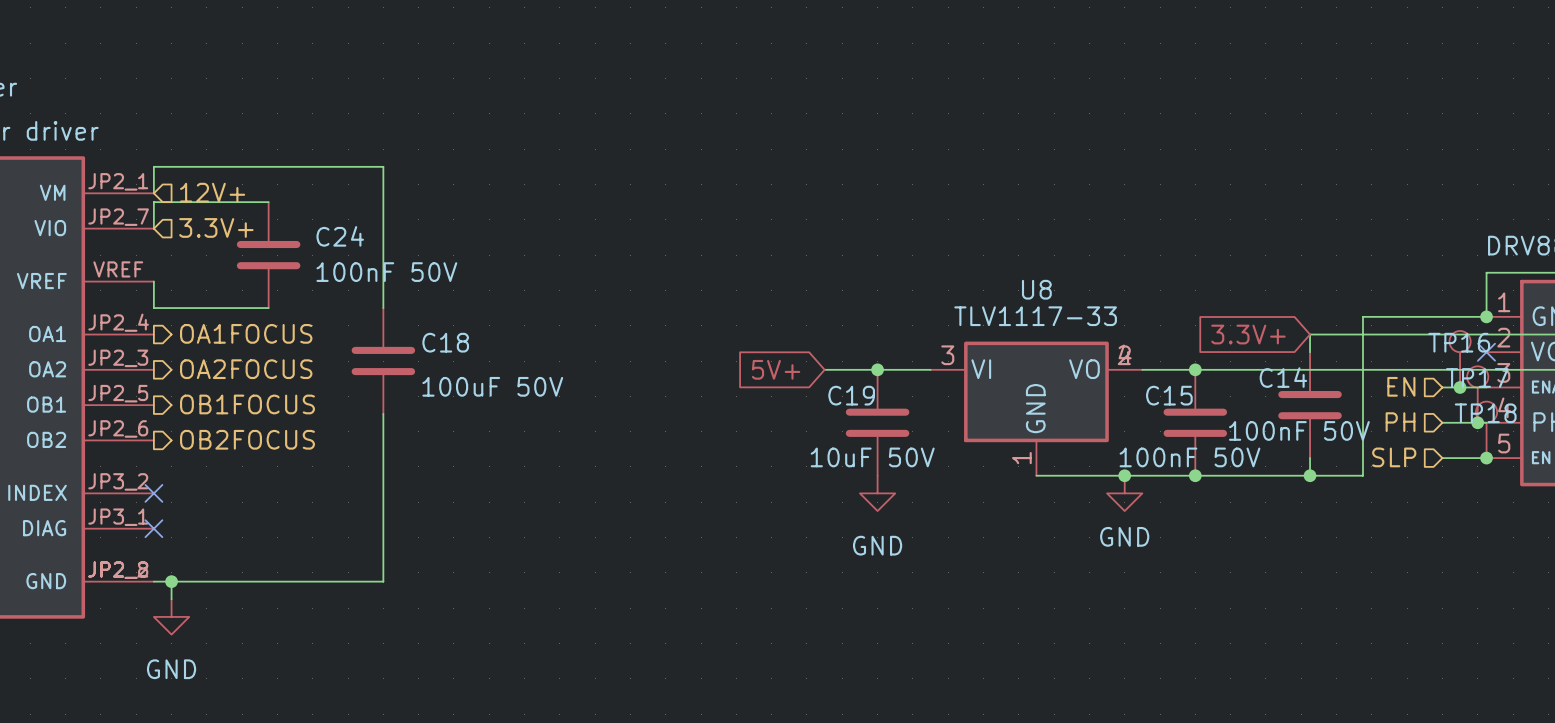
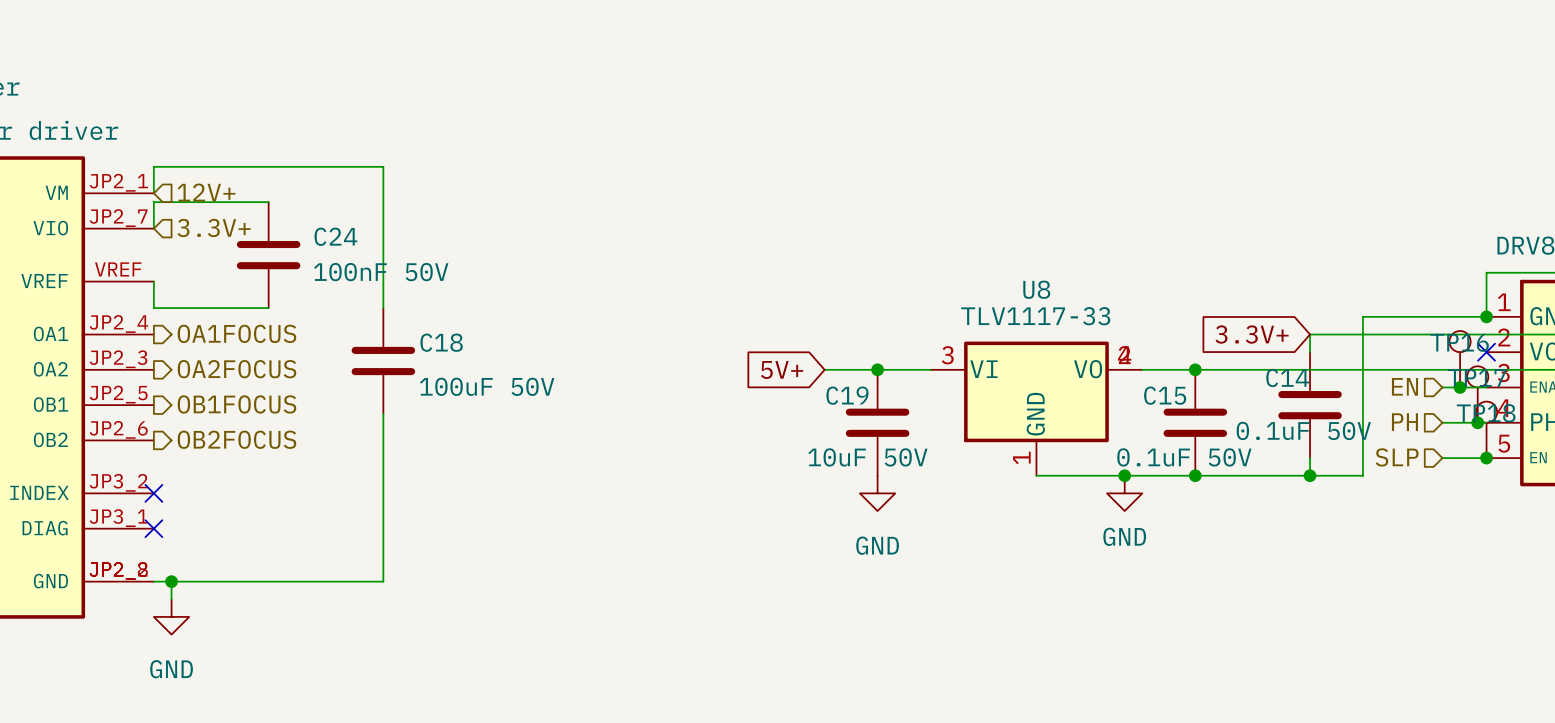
C14 value: 100nF 50V (1299, 430) -> 0.1uF 50V (1303, 430)
C15 value: 100nF 50V (1189, 457) -> 0.1uF 50V (1184, 457)

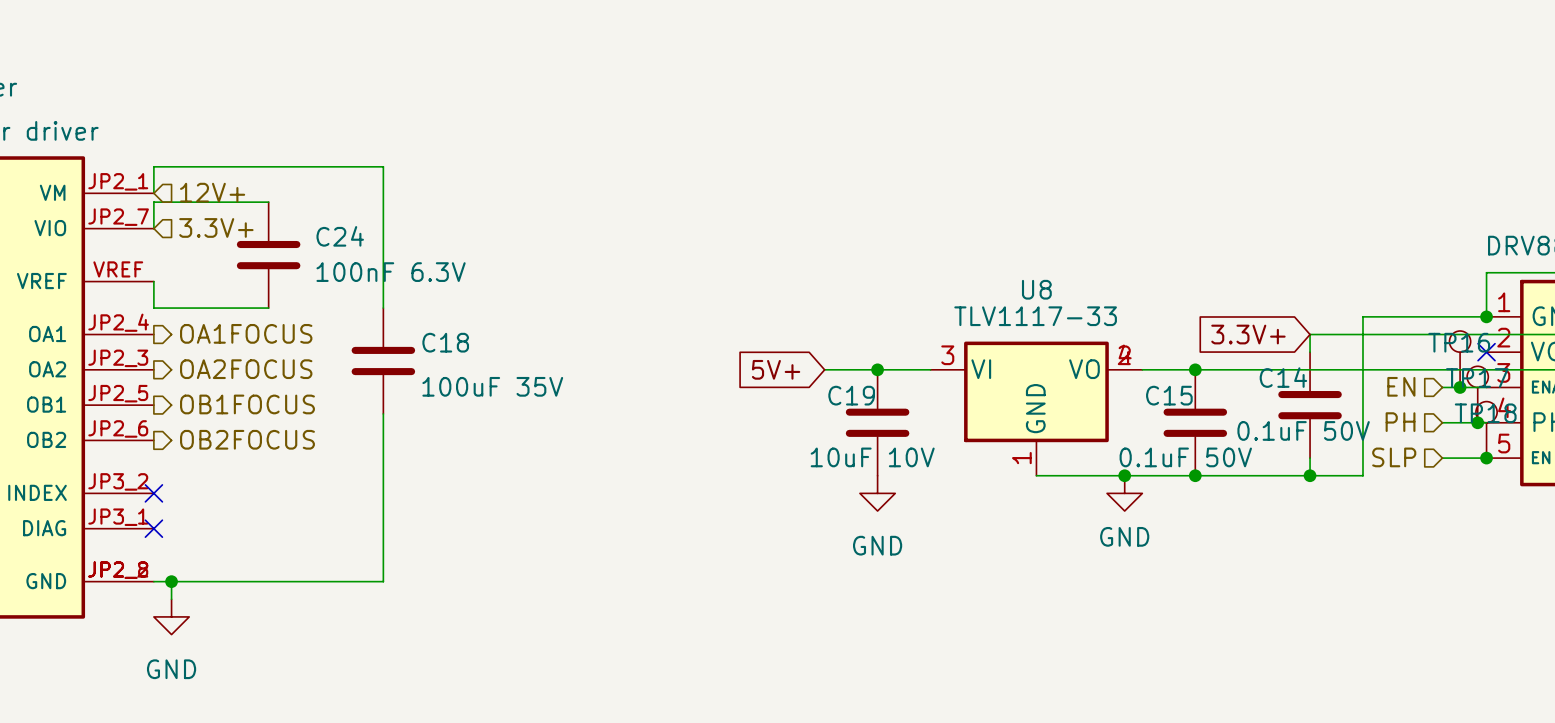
C24 value: 100nF 50V (381, 272) -> 100nF 6.3V (391, 272)
C18 value: 100uF 50V (487, 386) -> 100uF 35V (492, 386)
C19 value: 10uF 50V (867, 457) -> 10uF 10V (872, 457)

